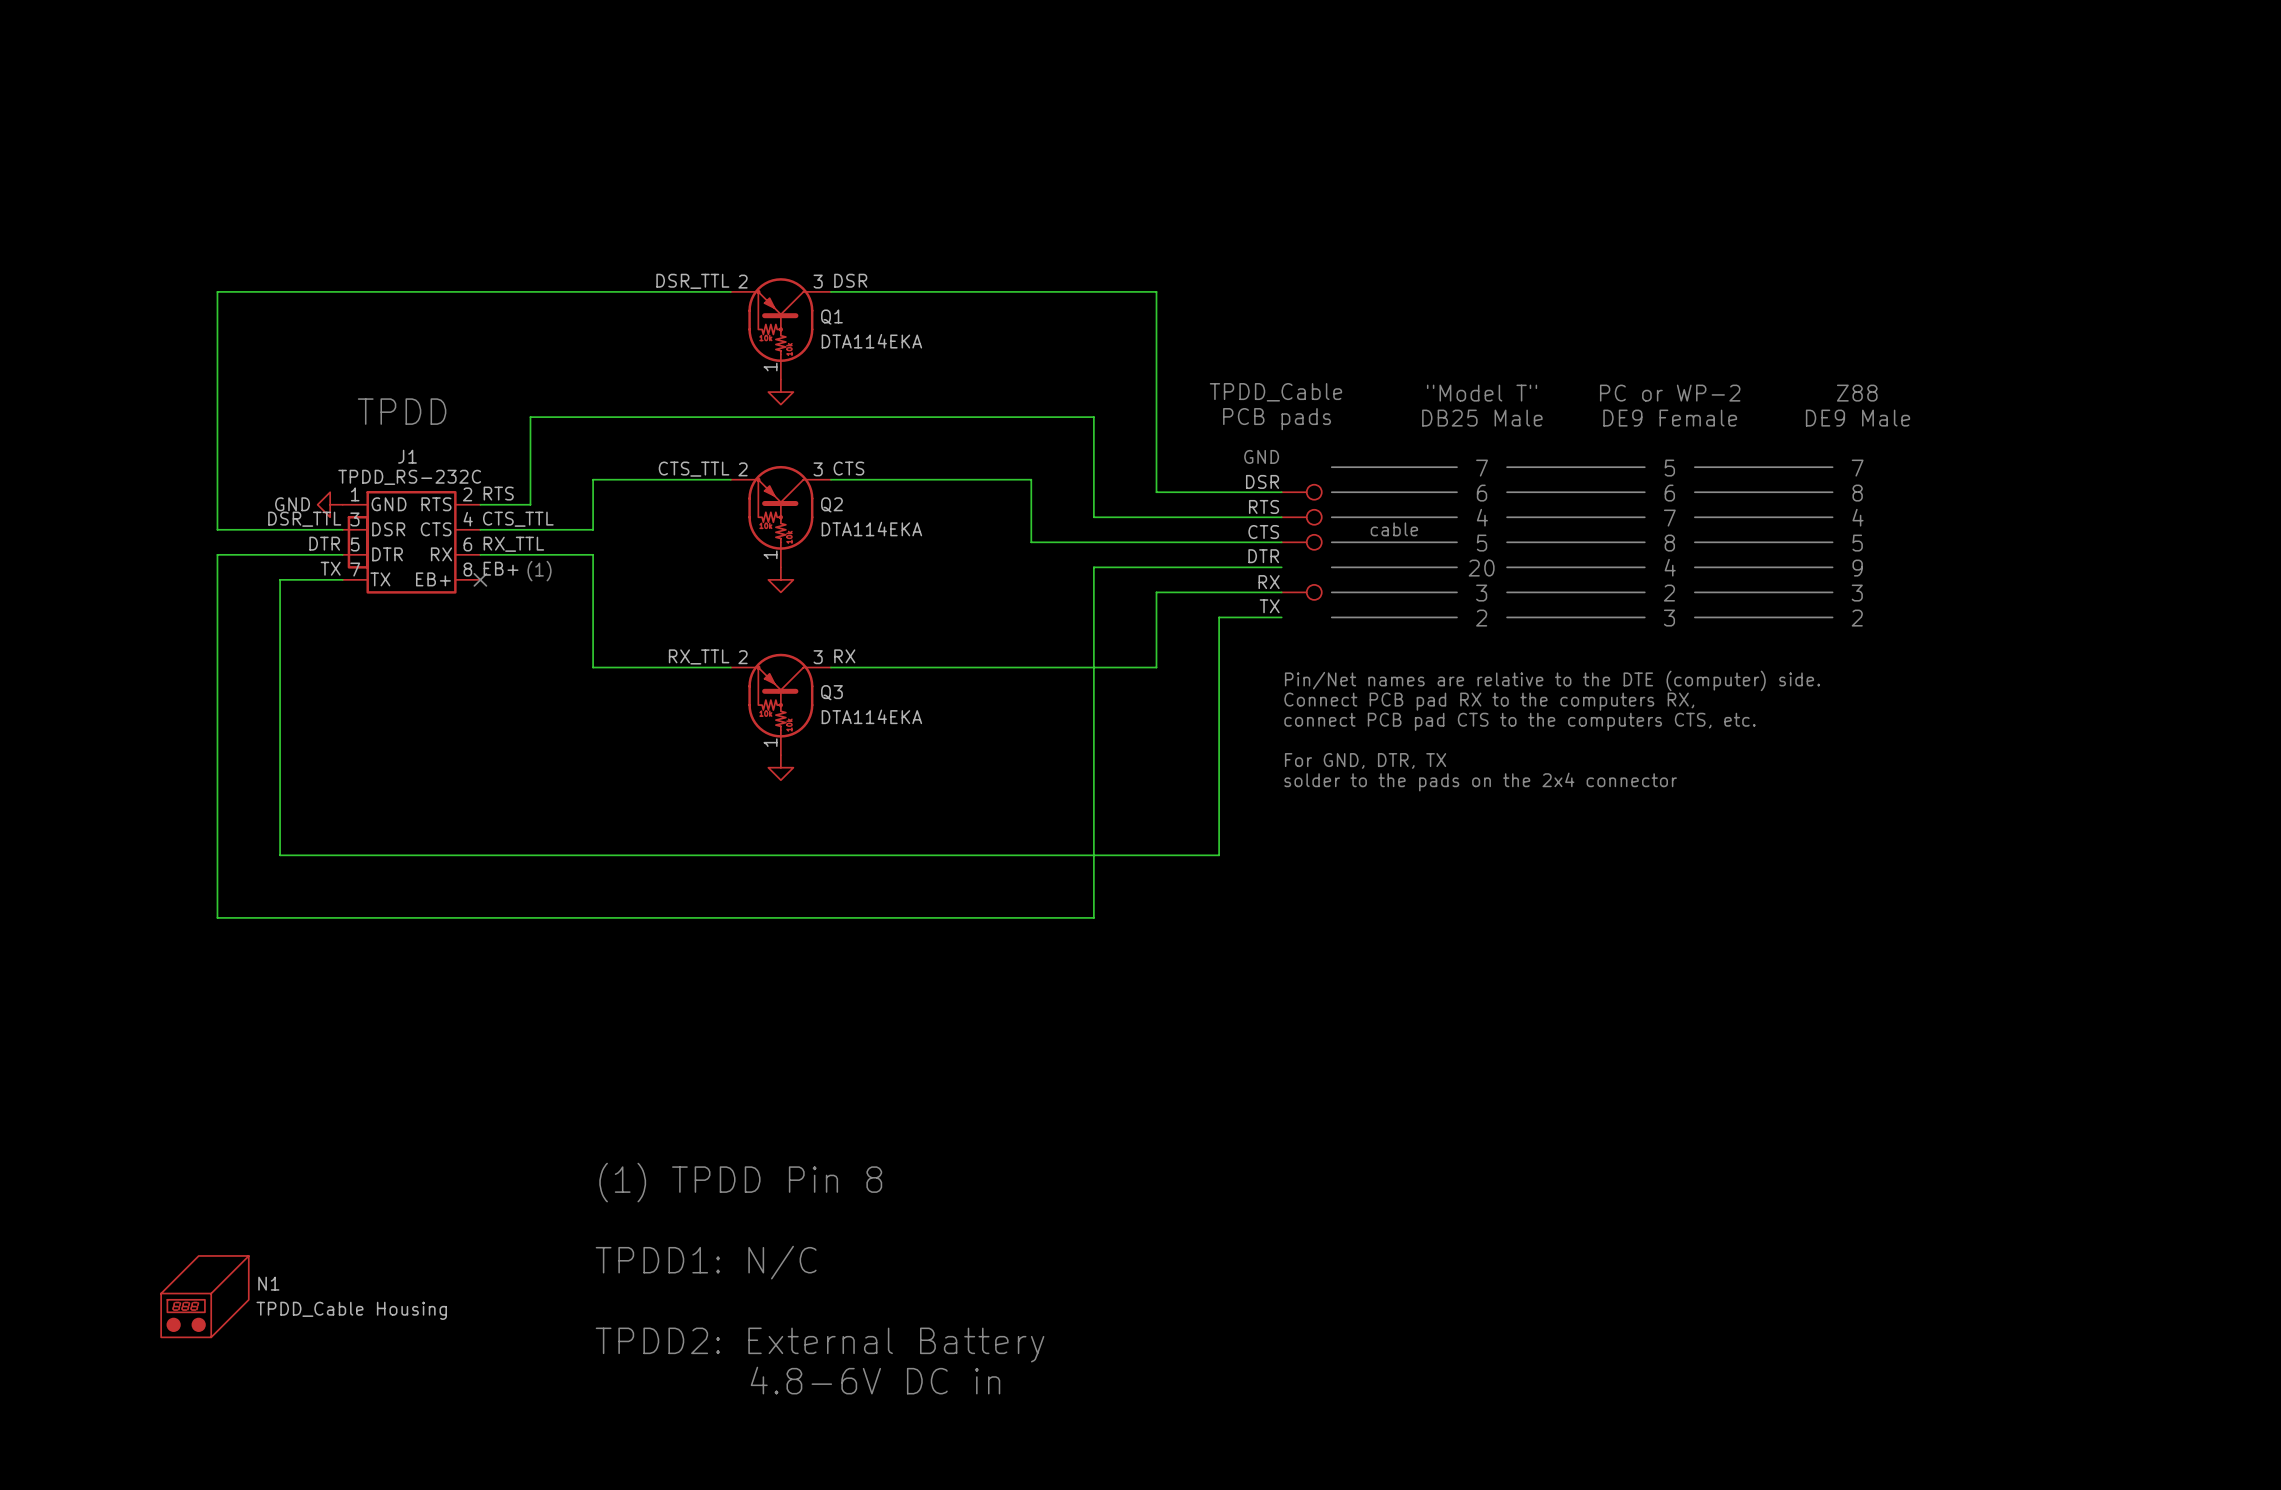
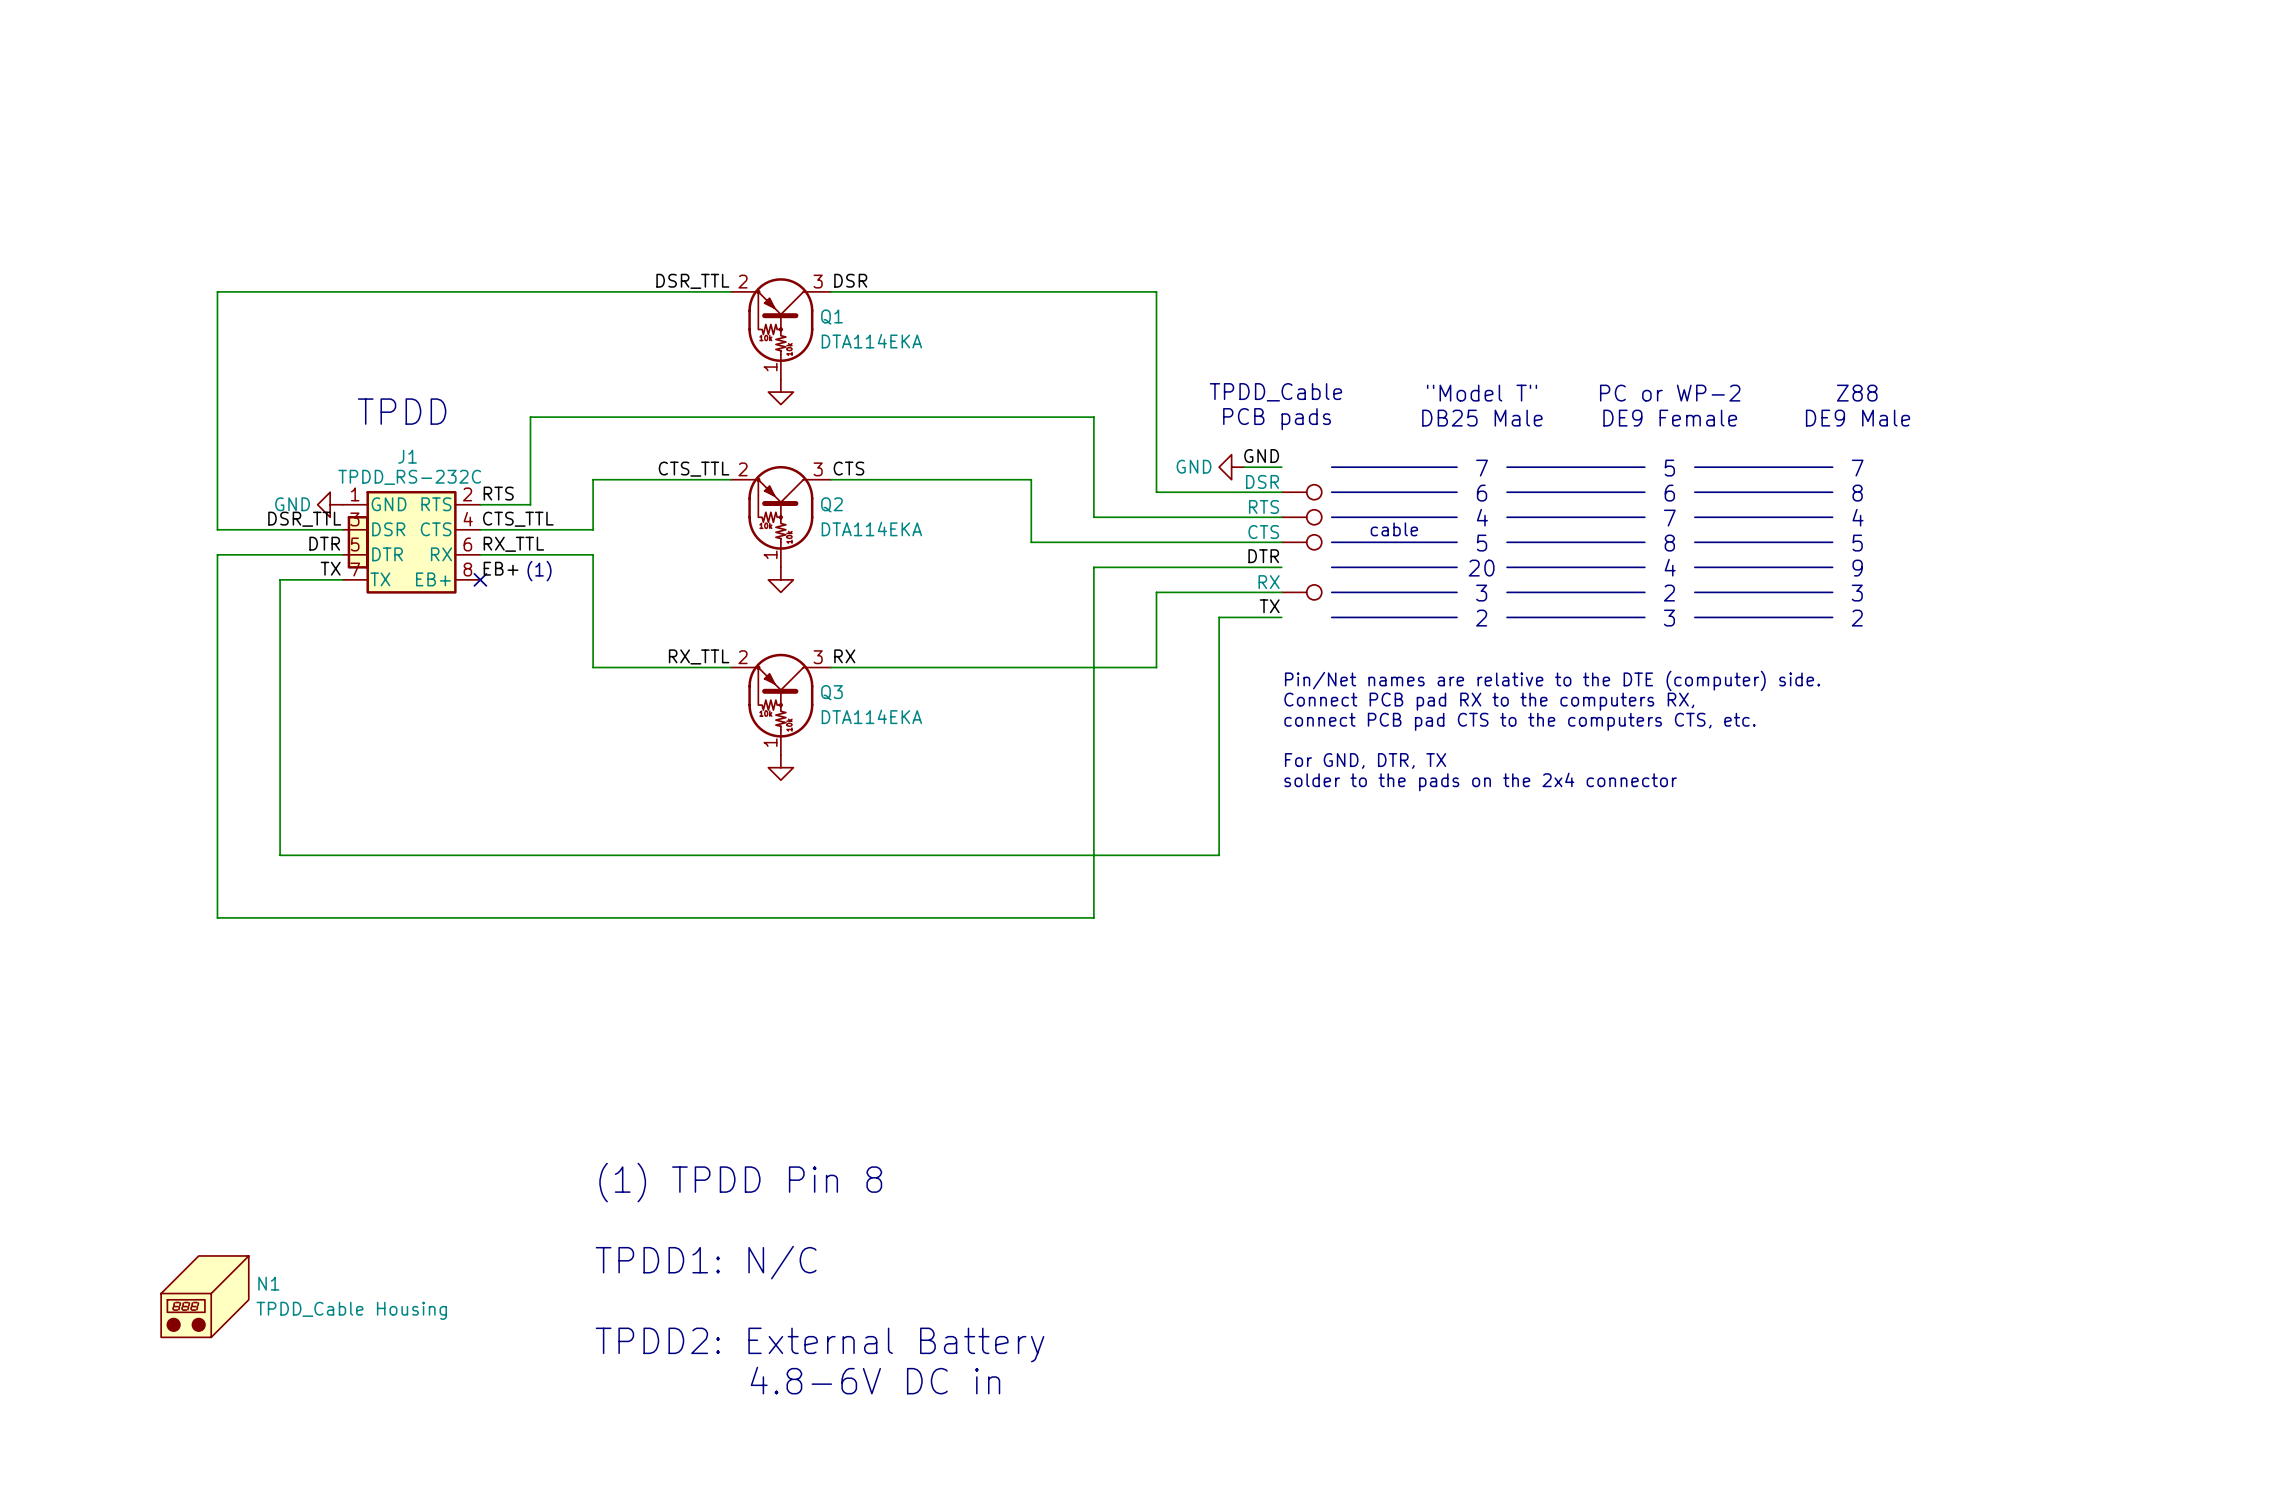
text: GND (1261, 456) -> none
label: none -> GND (1261, 456)
power symbol: none -> GND (1231, 467)
wire: none -> (1244, 467) (1281, 467)

